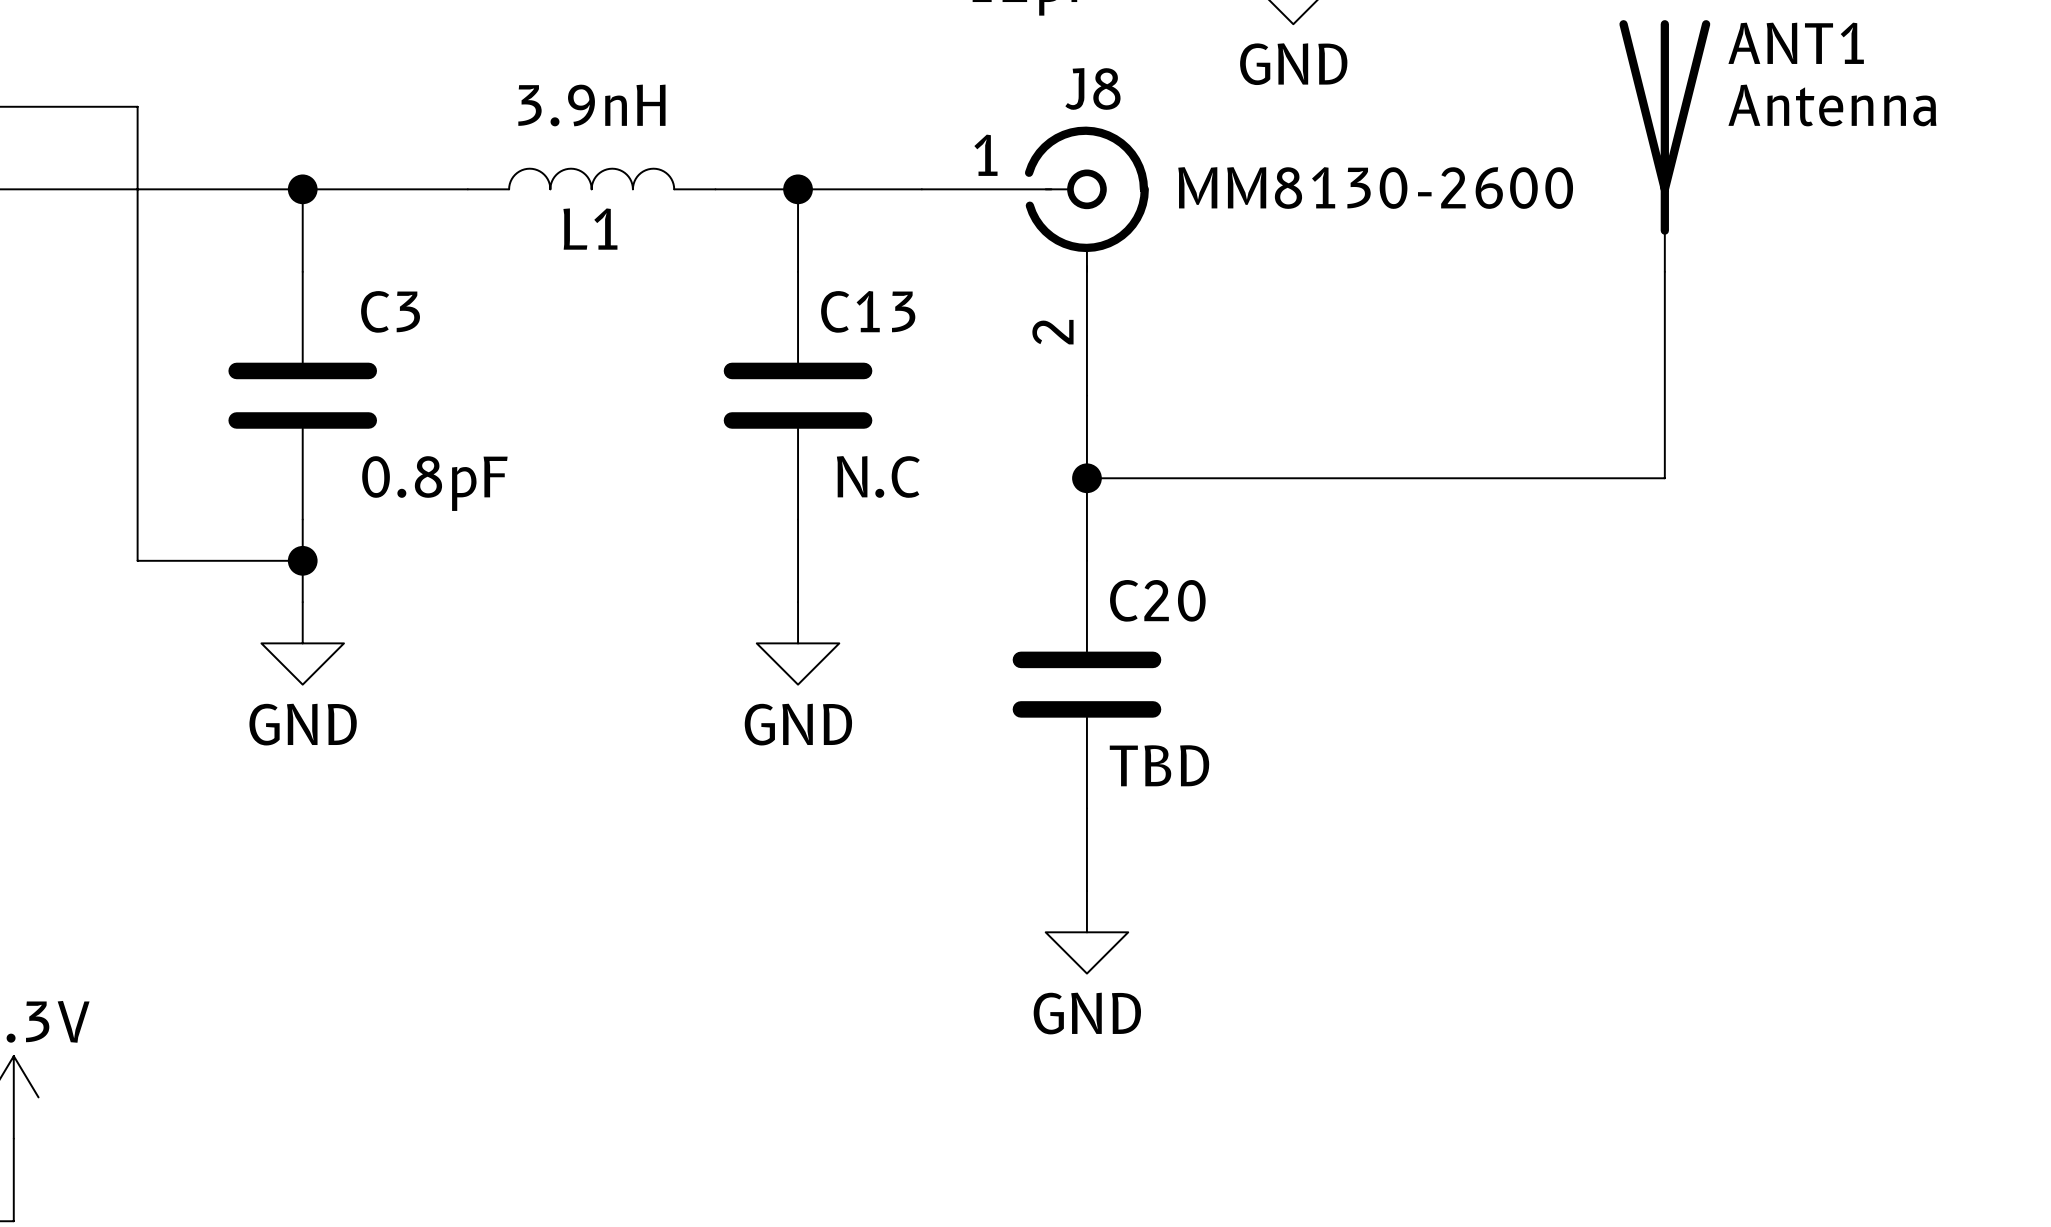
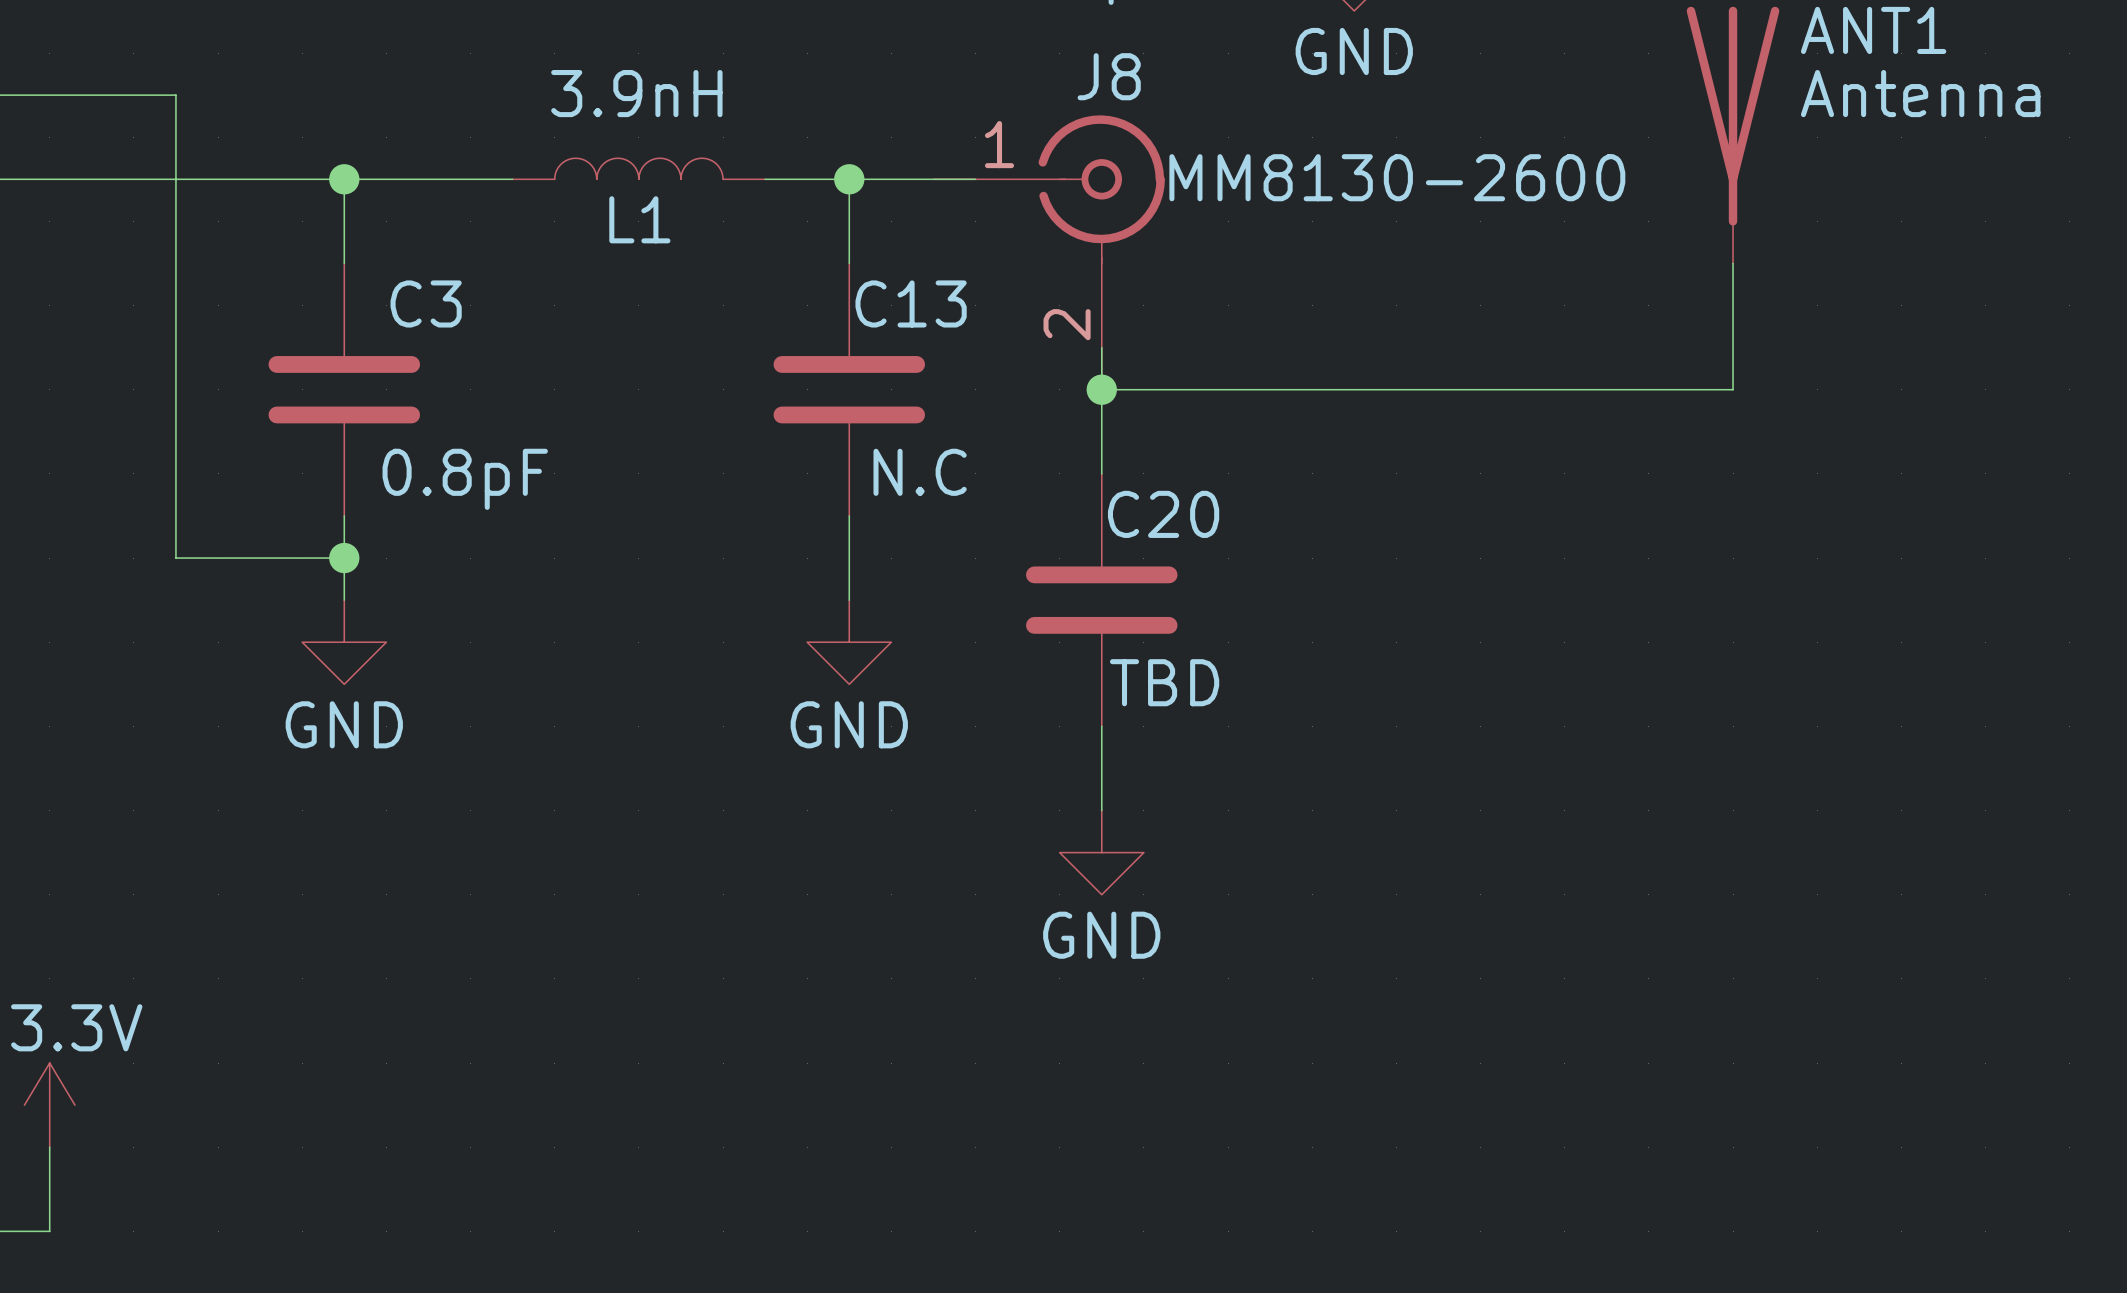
J8 position: (1035, 261) -> (1049, 252)
wire: none -> (1101, 347) (1101, 473)
wire: (1086, 395) (1086, 560) -> none
wire: (1664, 395) (1664, 478) (1086, 478) -> (1733, 389) (1101, 389)
junction position: (1086, 478) -> (1101, 389)
C20 position: (1086, 684) -> (1101, 600)
wire: (1086, 808) (1086, 891) -> (1101, 726) (1101, 810)
power symbol position: GND (1086, 932) -> GND (1101, 852)

